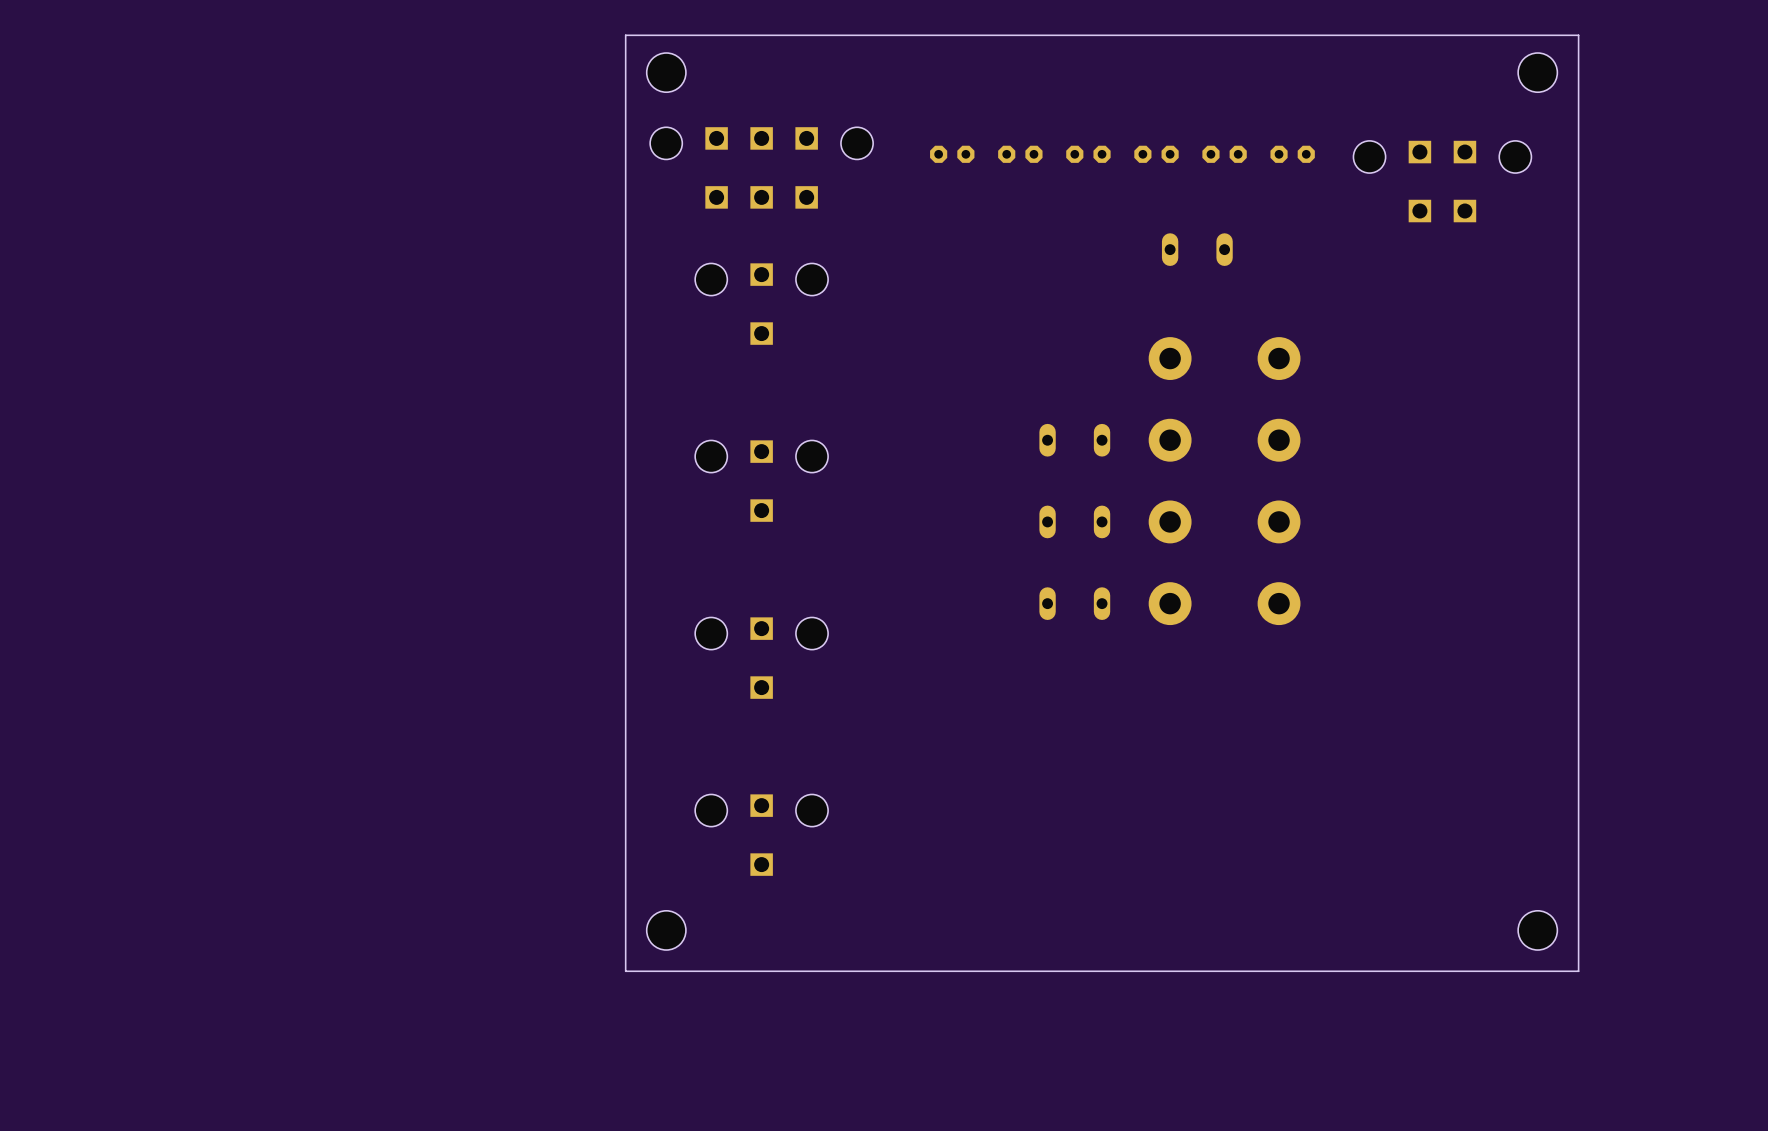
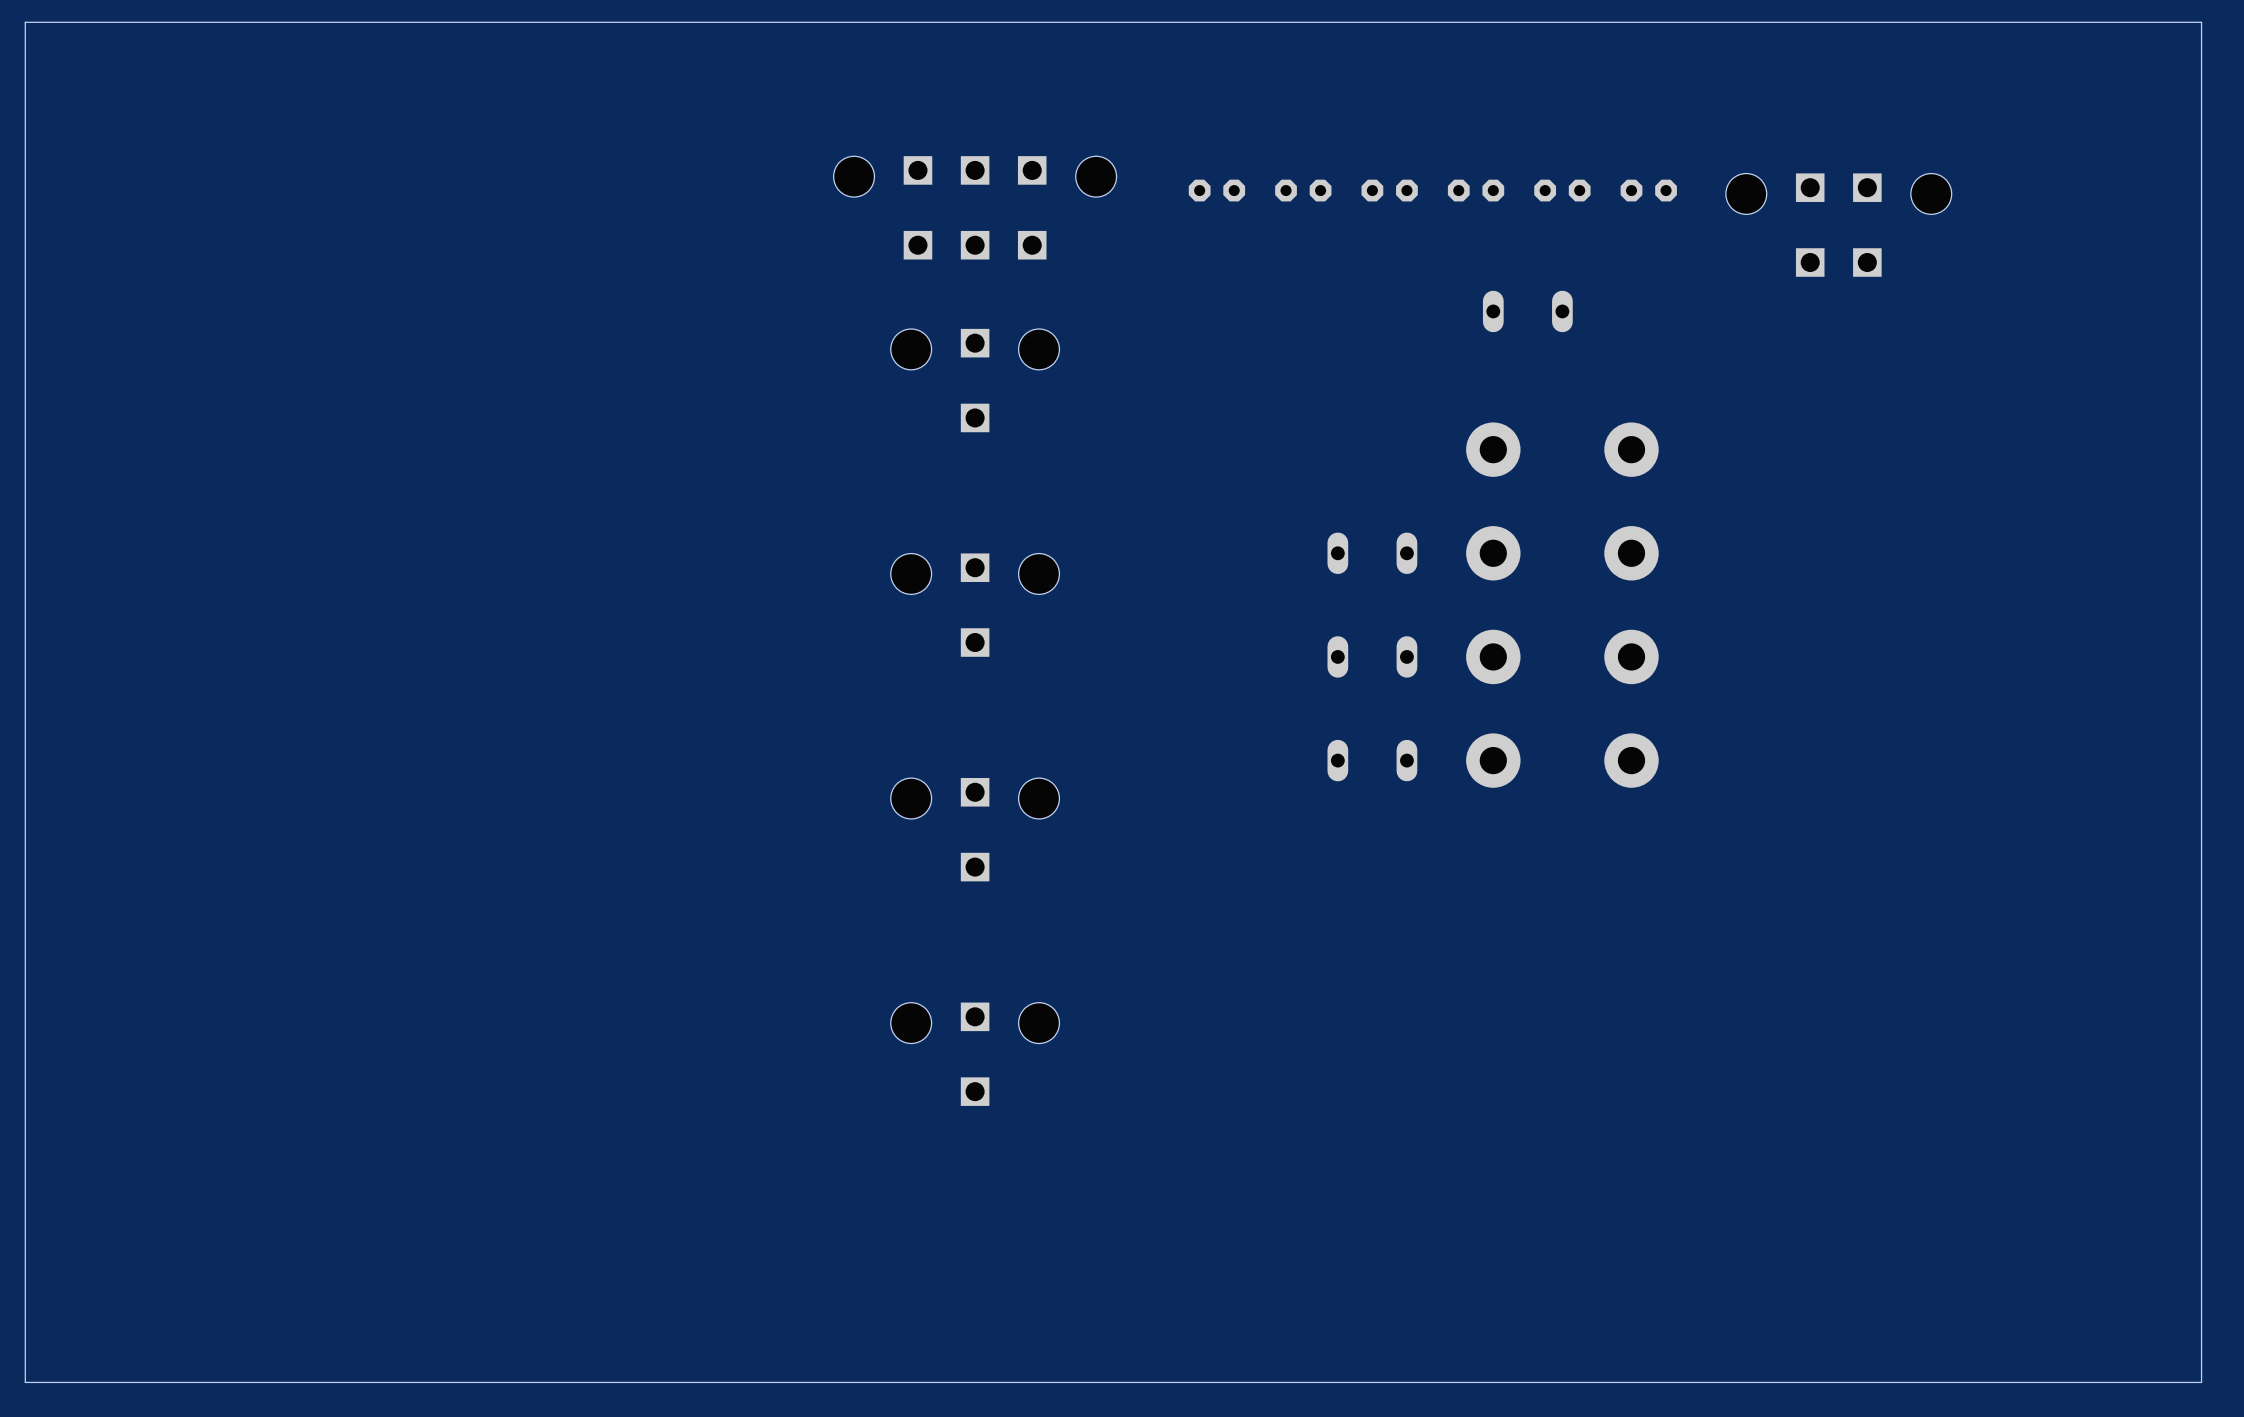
board edge: none -> (2201, 22) (25, 22) (25, 1382) (2201, 1382) (2201, 22)
board edge: (1578, 35) (625, 35) (625, 971) (1578, 971) (1578, 35) -> none
hole: (666, 72) -> none
hole: (1537, 72) -> none
hole: (666, 930) -> none
hole: (1537, 930) -> none

